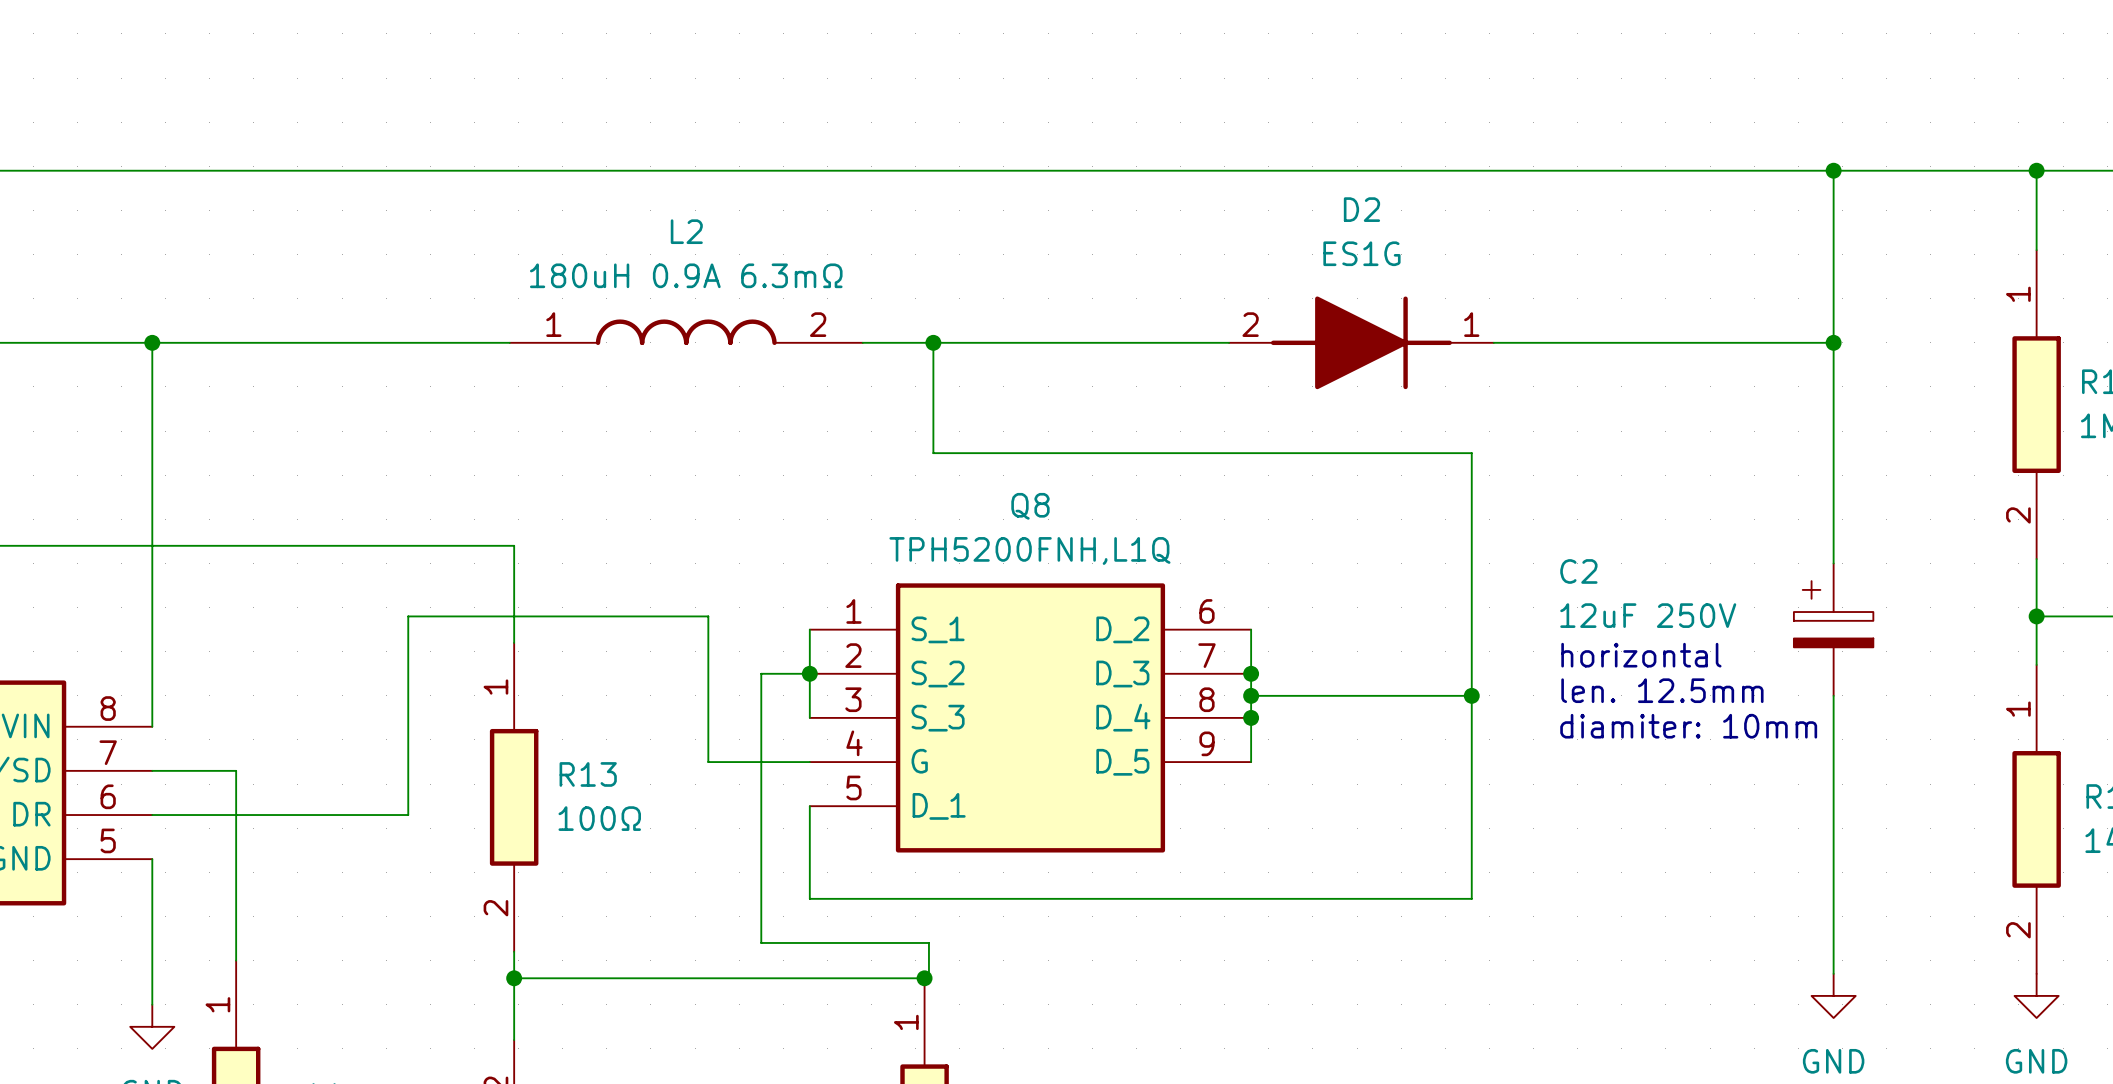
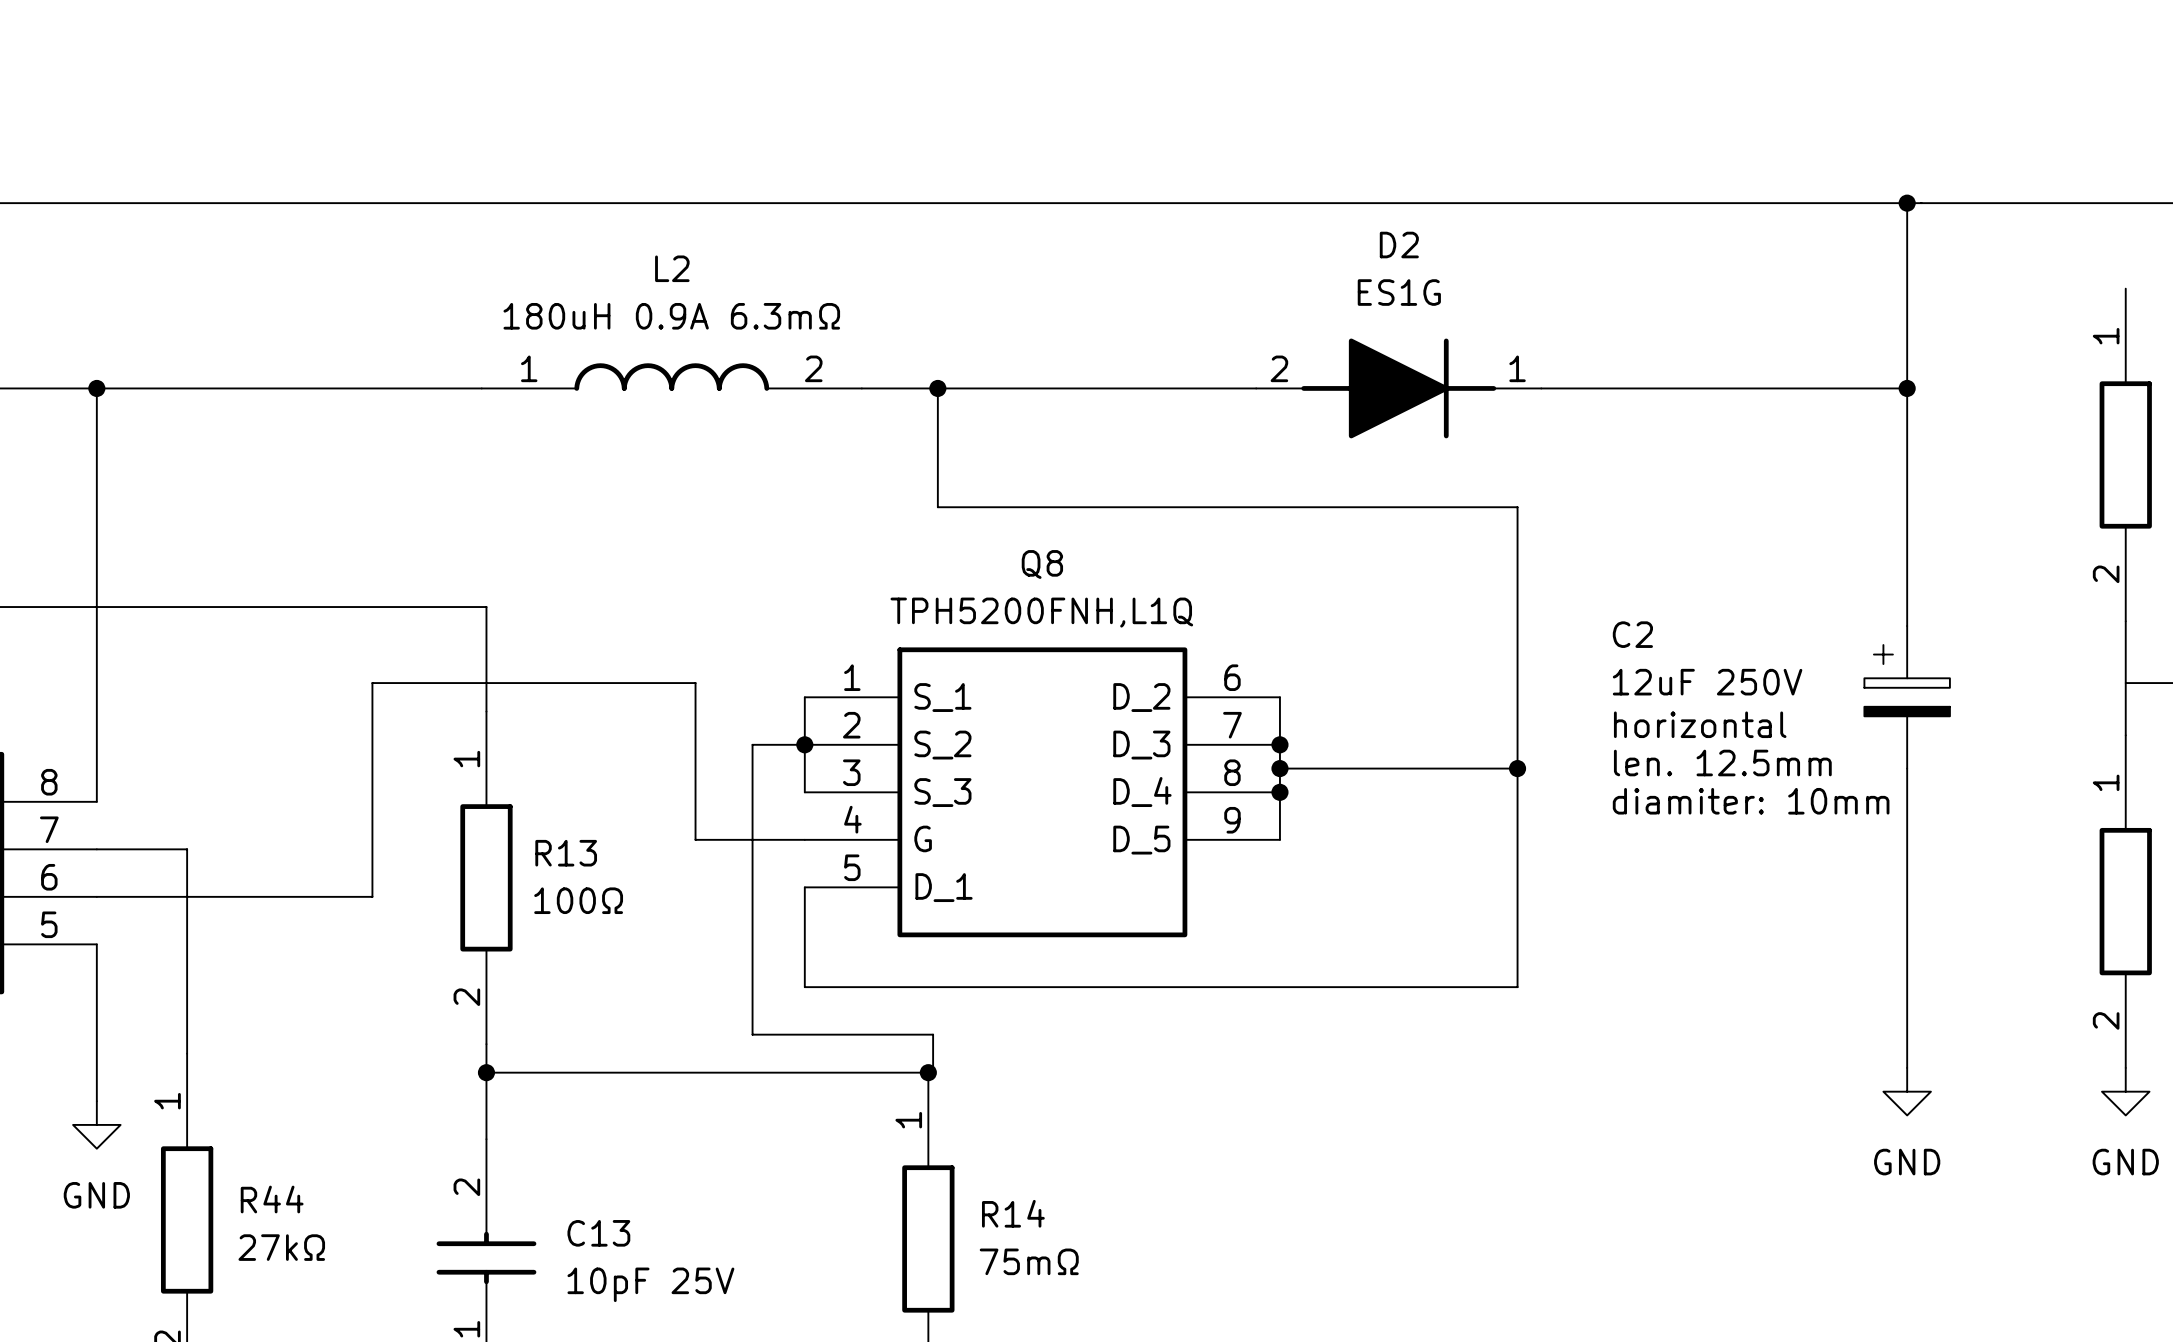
wire: (2036, 170) (2036, 250) -> none
junction: (2036, 170) -> none
junction: (2036, 616) -> none

